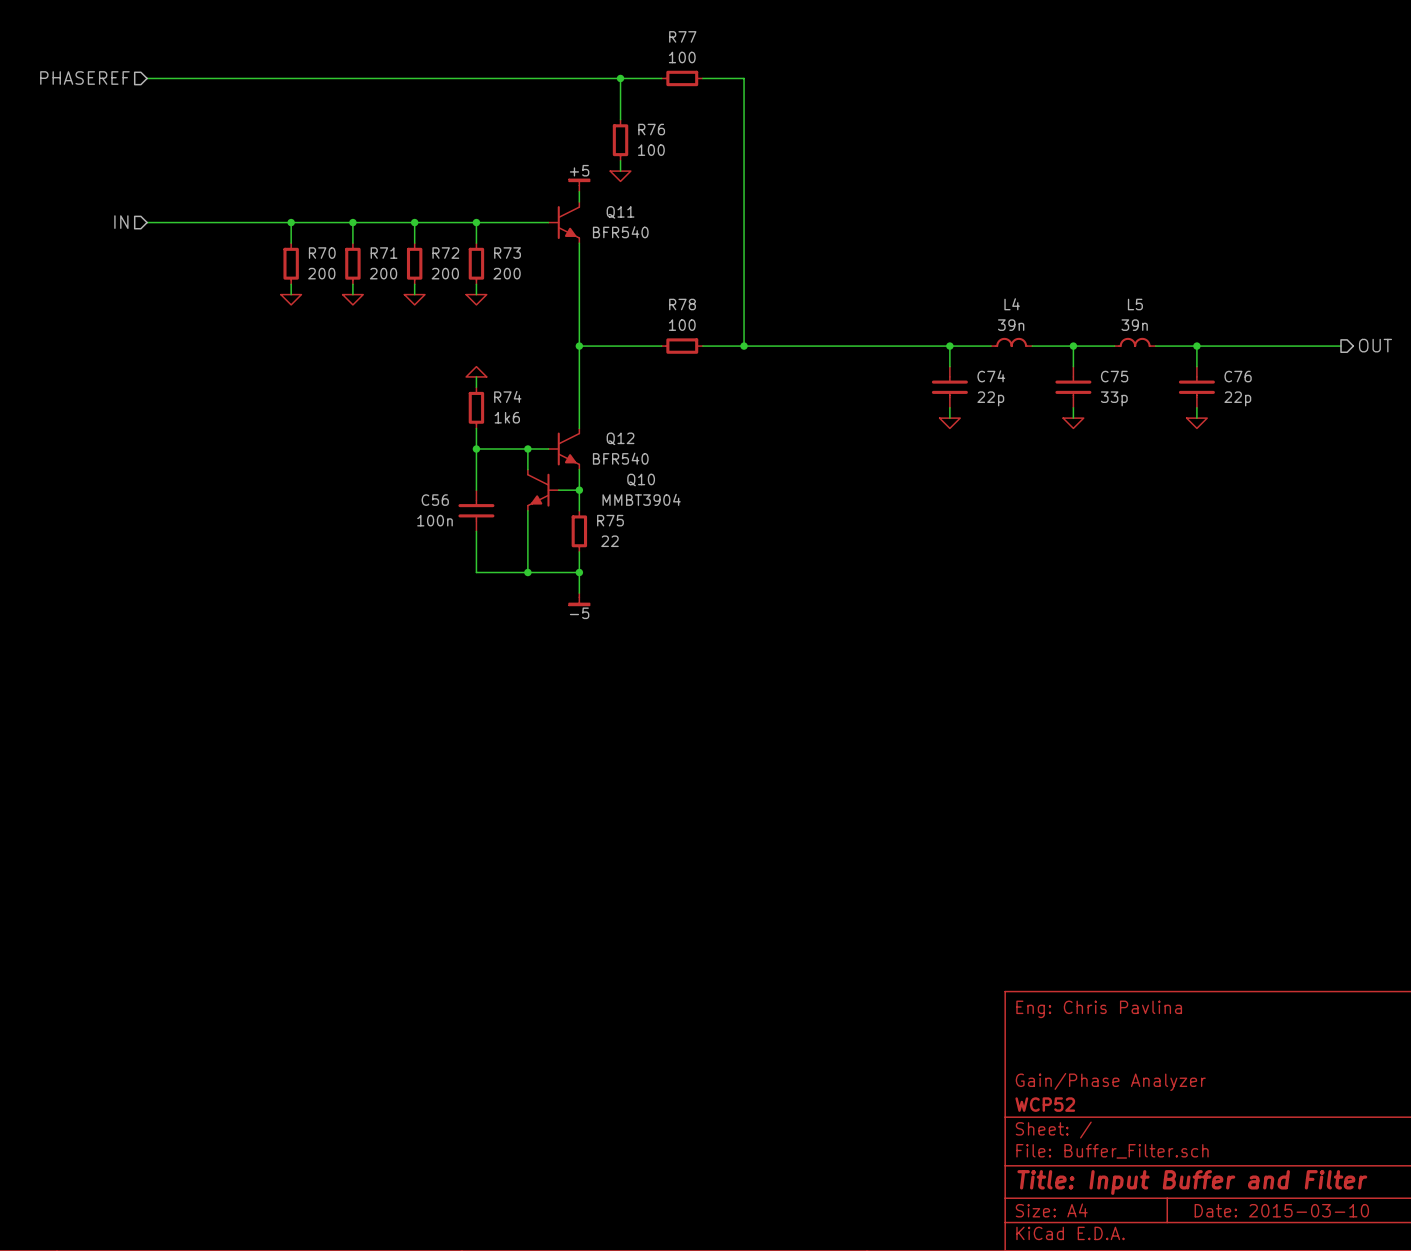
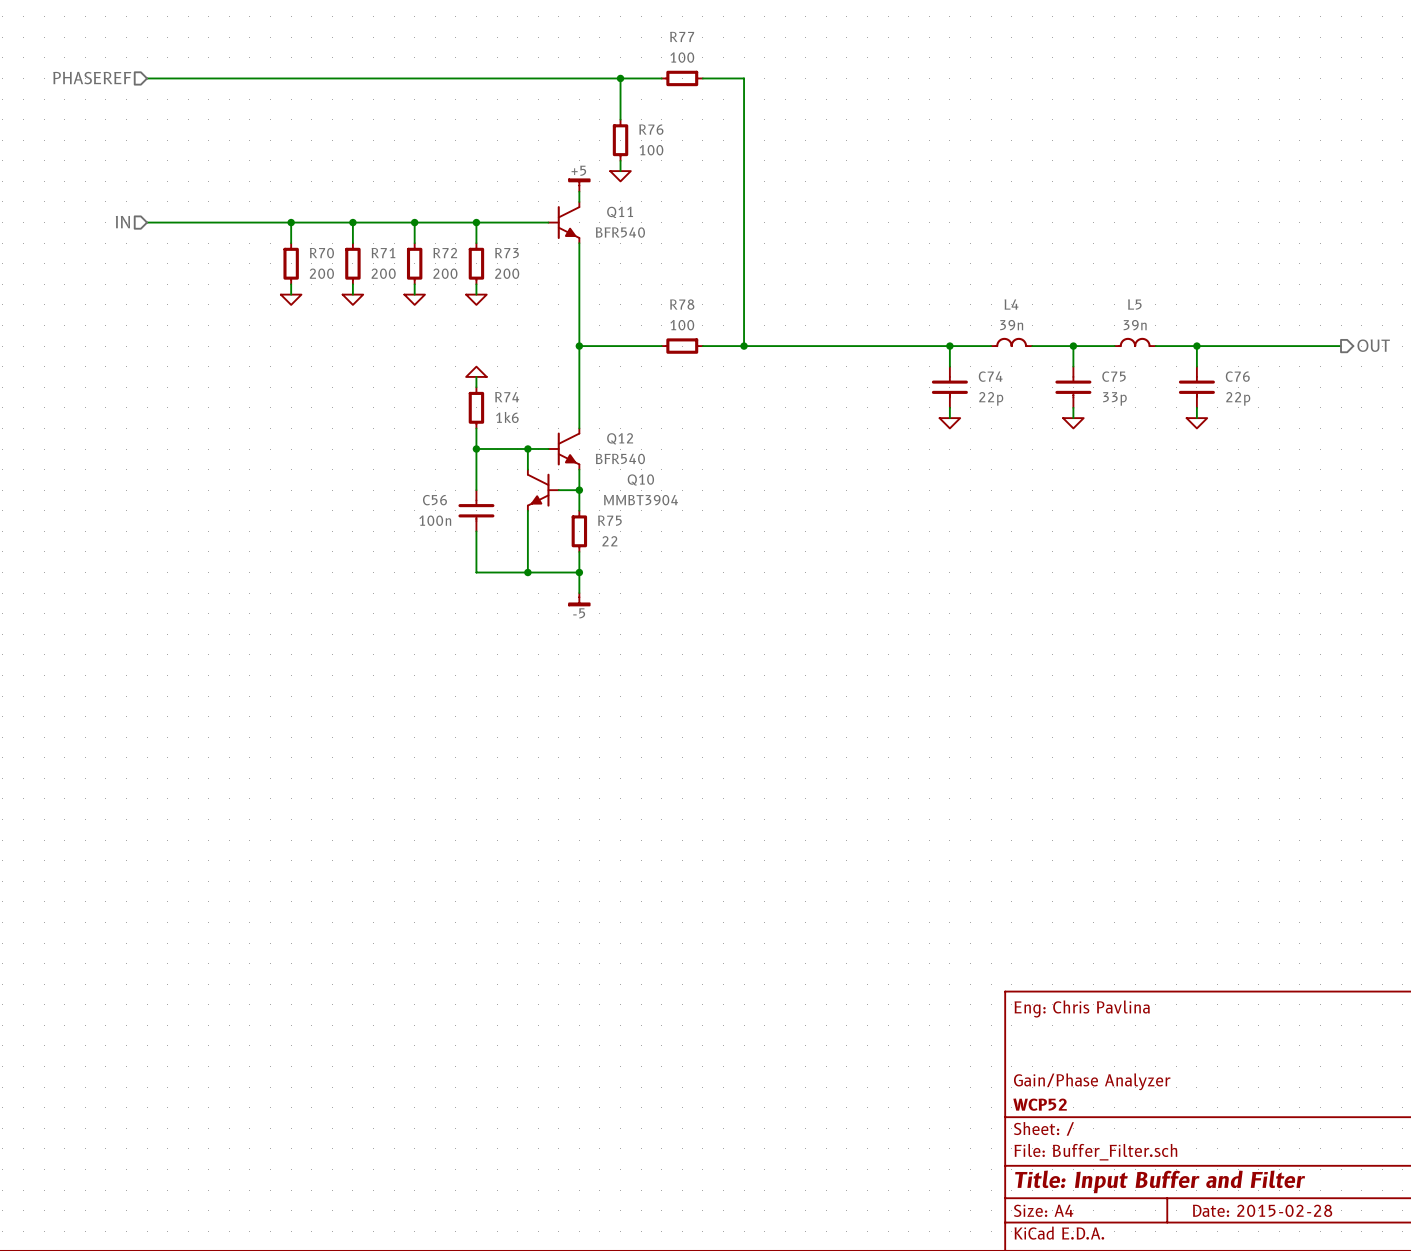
title block: Date: 2015-03-10 (1281, 1210) -> Date: 2015-02-28 (1262, 1210)

